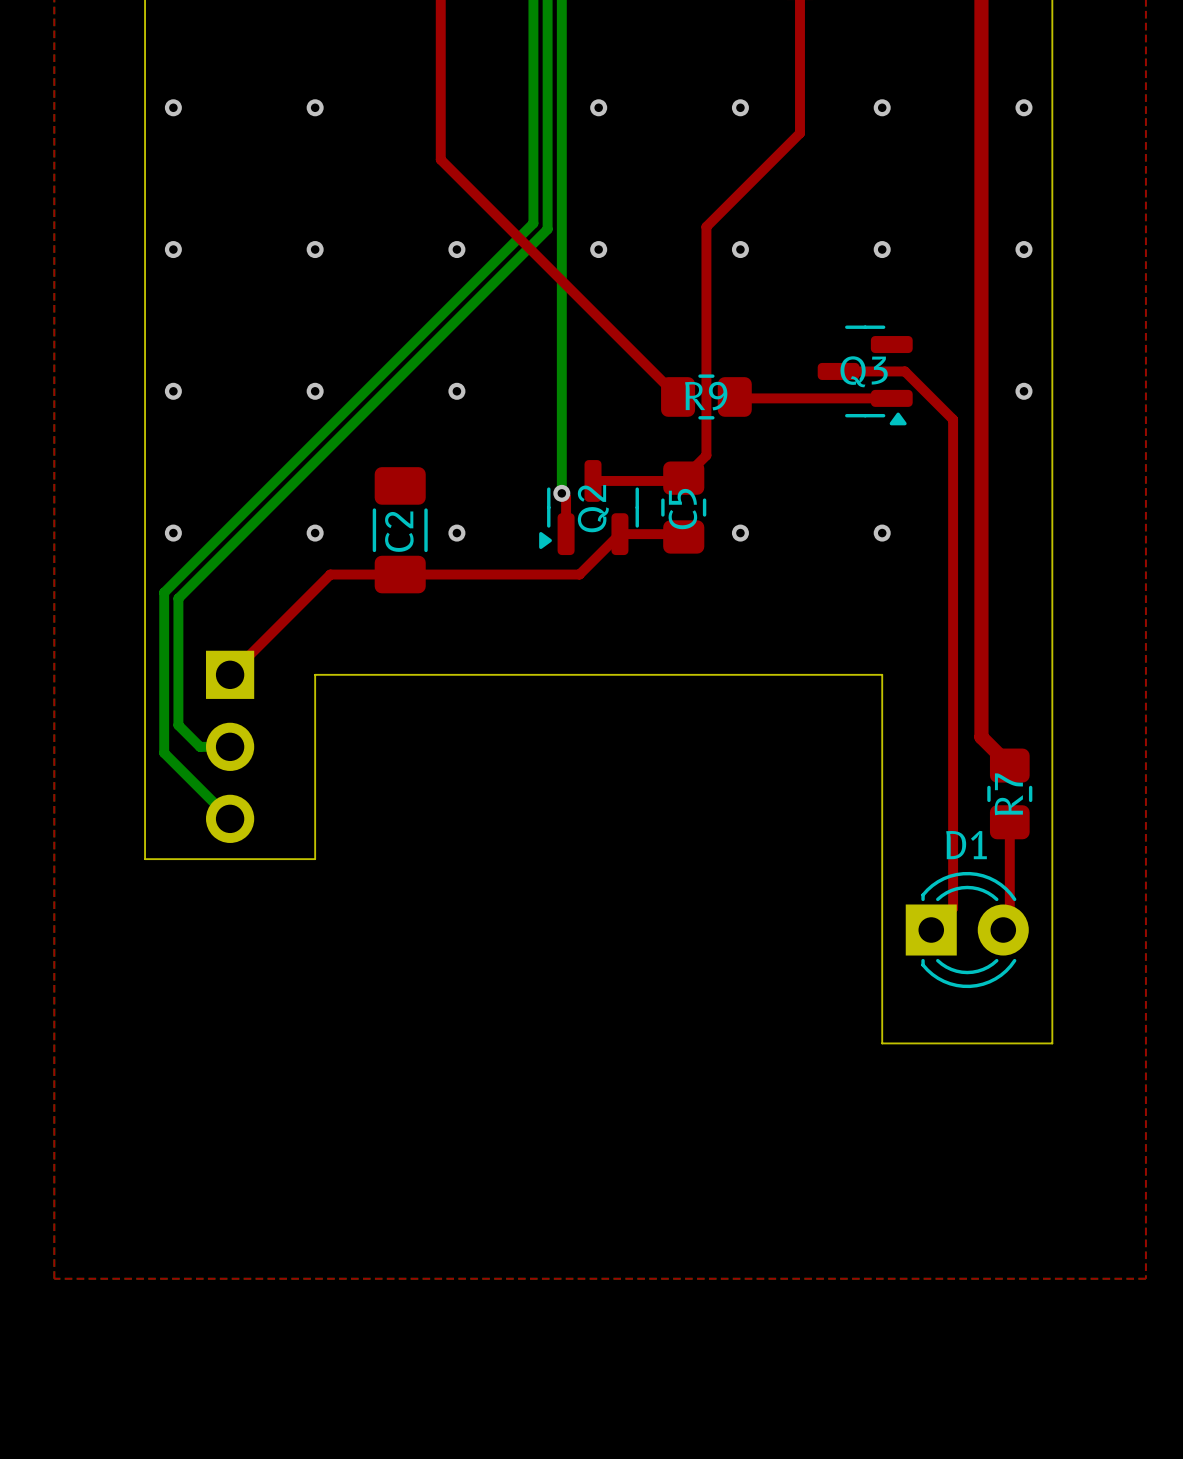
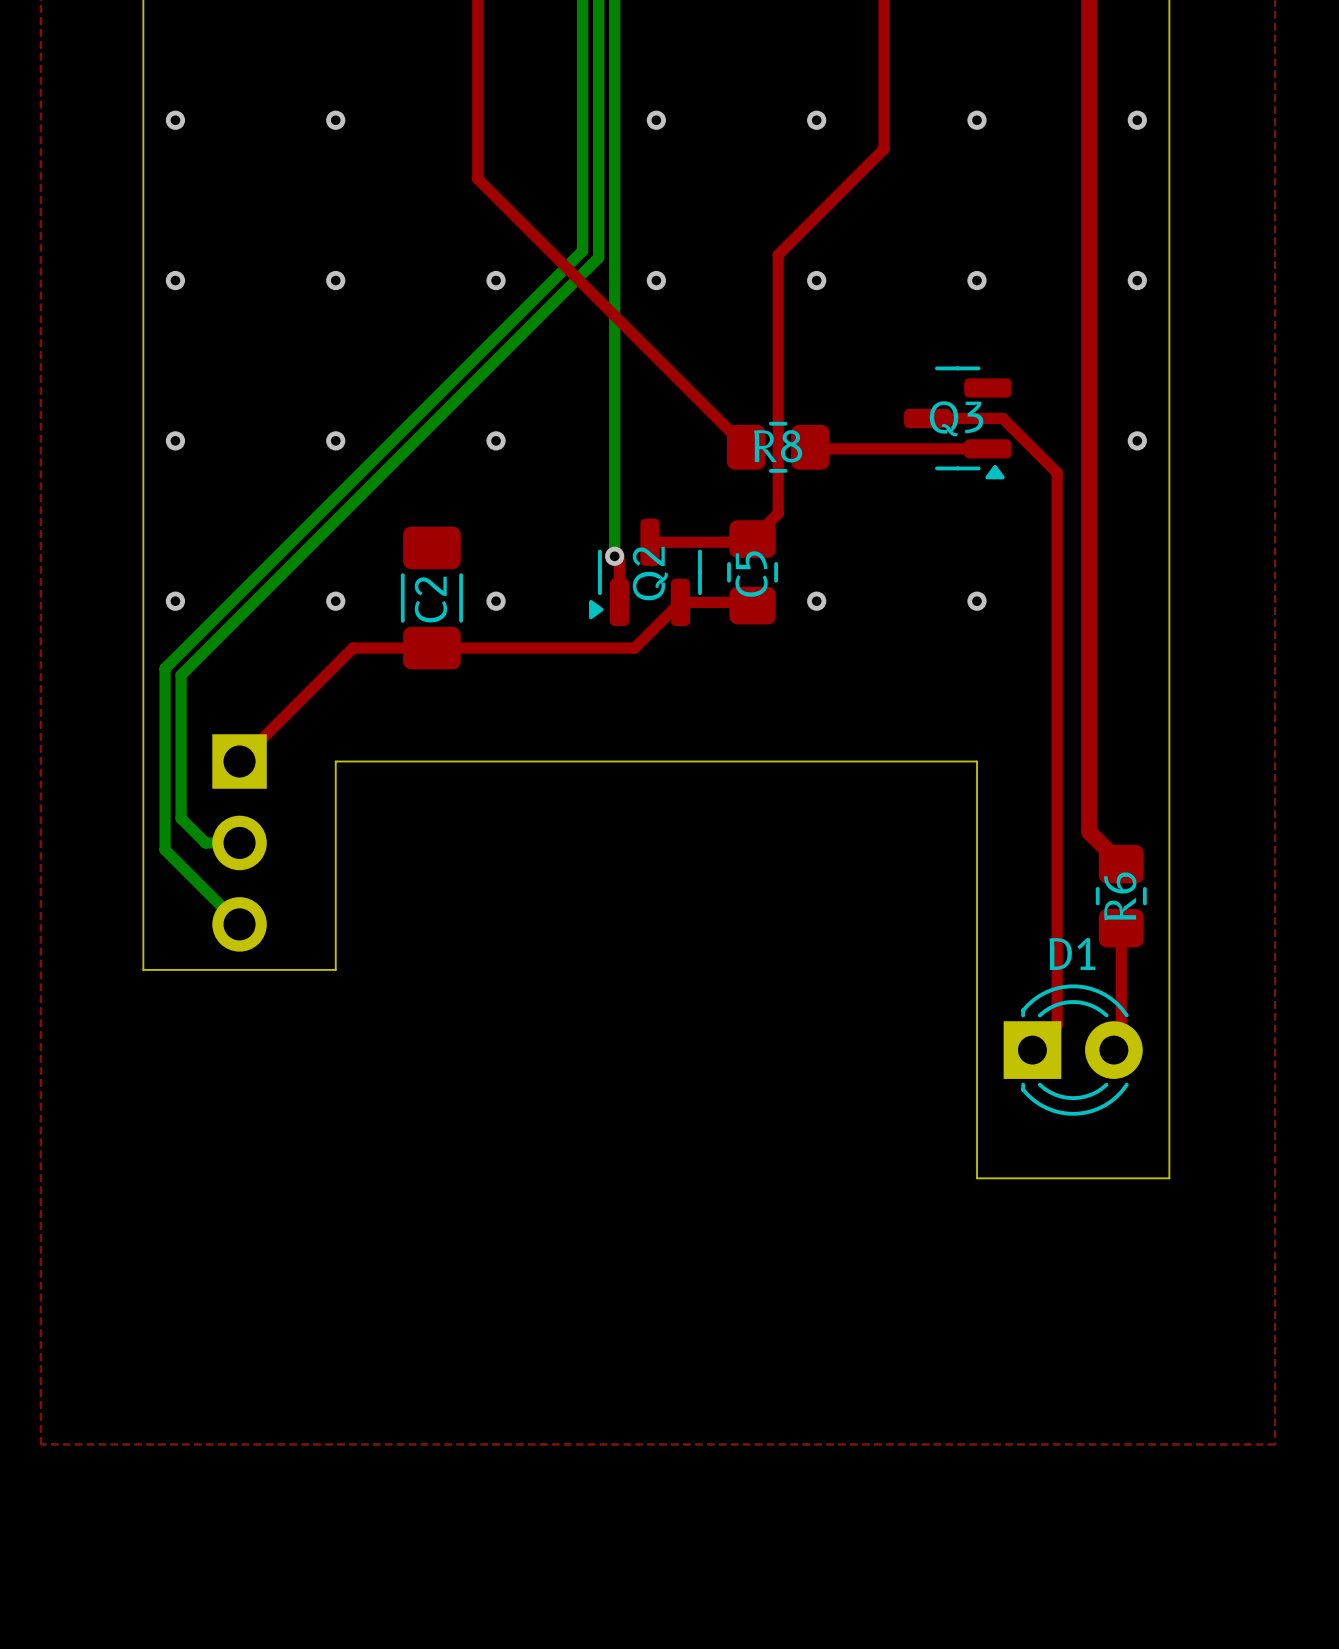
R9 name: R9 (706, 396) -> R8 (778, 446)
R7 name: R7 (1008, 794) -> R6 (1120, 896)

